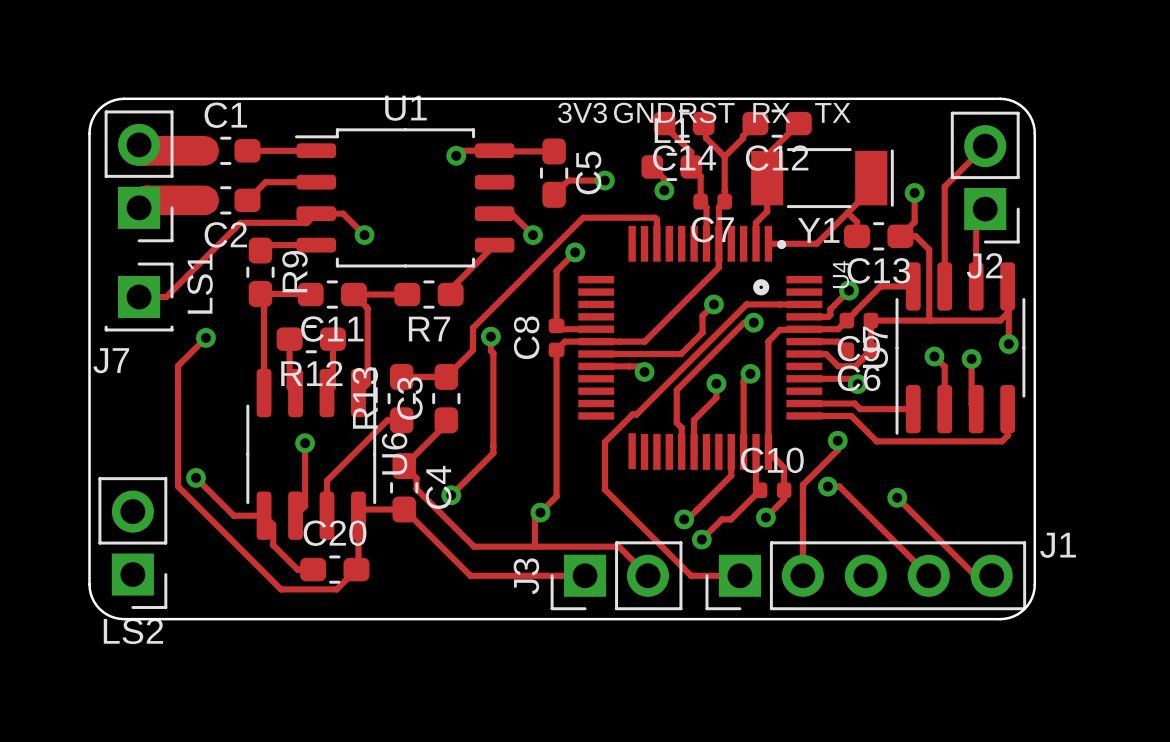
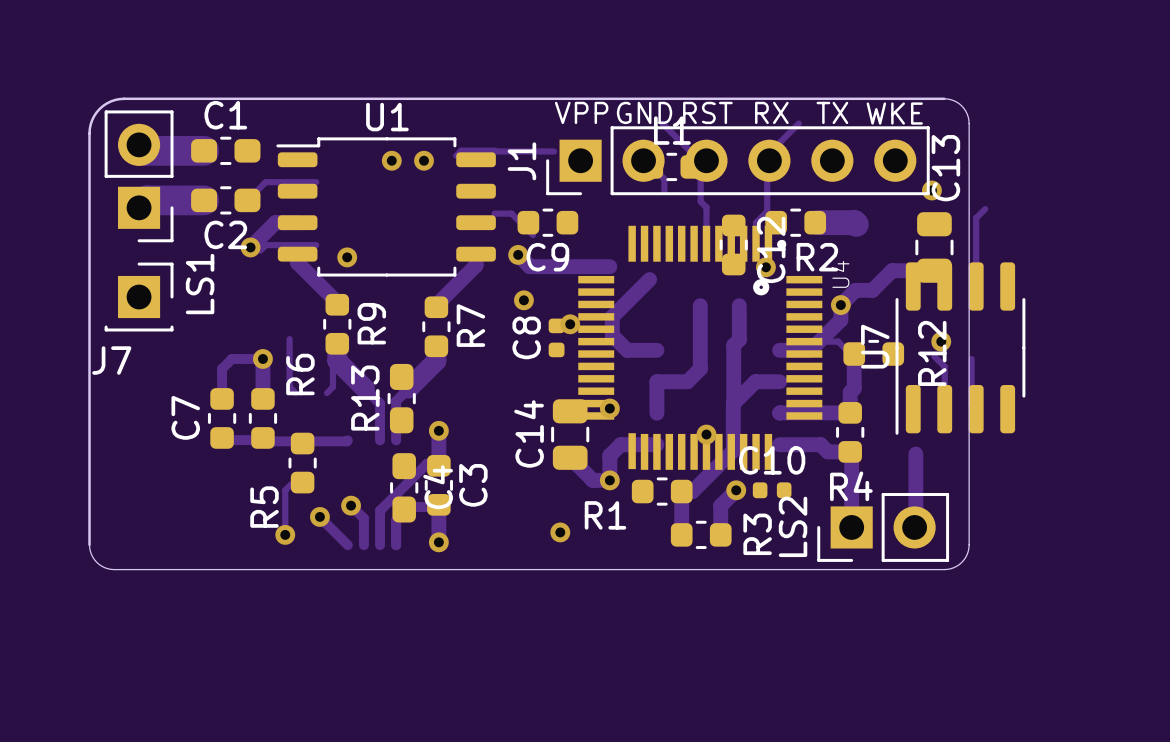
board edge: (944, 98) (1009, 99) (1017, 103) (1027, 112) (1034, 128) (1034, 584) (1030, 601) (1017, 614) (1000, 619) (119, 618) (103, 611) (92, 597) (89, 584) (89, 544) -> (944, 98) (953, 100) (961, 106) (967, 114) (969, 123) (969, 544) (965, 557) (956, 566) (944, 569) (114, 569) (104, 567) (96, 562) (91, 554) (89, 544)
C14 footprint: [653, 109, 715, 138] -> [551, 399, 590, 470]
C12 footprint: [742, 109, 812, 138] -> [719, 214, 748, 276]
text: 3V3 (582, 112) -> VPP (581, 112)
text: none -> WKE (894, 113)
track: (705, 123) (705, 137) (724, 156) -> none
track: (755, 123) (724, 156) -> none
track: (985, 146) (944, 186) (944, 286) -> none
track: (247, 150) (316, 150) -> none
via: (456, 155) -> none
track: (724, 156) (724, 201) (718, 207) (718, 267) (644, 341) (564, 341) (556, 349) (556, 496) (534, 518) (534, 546) -> none
C14 name position: C14 (684, 158) -> C14 (529, 433)
via: none -> (391, 160)
via: none -> (424, 160)
C5: (554, 173) -> none
J2: (985, 177) -> none
Y1: (822, 178) -> none
track: (871, 178) (871, 189) (816, 243) (768, 243) -> none
track: (604, 180) (568, 180) (554, 194) -> none
via: (604, 180) -> none
via: (664, 190) -> none
track: (914, 192) (914, 222) (900, 236) (915, 236) (929, 249) (930, 320) -> none
via position: (914, 192) -> (931, 190)
C7 footprint: [693, 193, 733, 210] -> [207, 388, 237, 449]
U1 position: (404, 197) -> (386, 206)
track: (847, 212) (857, 222) (857, 236) -> none
track: none -> (297, 222) (275, 222) (250, 247)
R2: none -> (795, 222)
track: none -> (817, 222) (854, 222) (856, 224)
C13 footprint: [844, 222, 914, 251] -> [915, 212, 954, 283]
track: (364, 235) (343, 213) (316, 213) (307, 222) (240, 222) (166, 297) (139, 297) -> none
via position: (364, 235) -> (347, 257)
via position: (533, 235) -> (518, 254)
R9 footprint: [246, 237, 275, 307] -> [323, 293, 352, 355]
track: (656, 243) (656, 219) (655, 217) (583, 217) (472, 328) (472, 350) (446, 376) (401, 376) -> none
track: (494, 245) (450, 289) (450, 294) -> none
via: none -> (250, 247)
track: (575, 252) (556, 271) (556, 325) (559, 329) (596, 329) -> none
via: (575, 252) -> none
track: none -> (297, 254) (297, 262) (337, 302)
track: none -> (476, 254) (476, 265) (436, 305)
track: none -> (518, 254) (529, 266) (609, 266)
via: none -> (765, 267)
C13 name position: C13 (878, 270) -> C13 (945, 168)
track: none -> (934, 270) (892, 270) (872, 290) (855, 290) (840, 305) (840, 319) (810, 350) (779, 350)
track: none -> (649, 279) (612, 316) (612, 335) (627, 350) (656, 350)
R7 footprint: [394, 280, 464, 309] -> [422, 296, 451, 358]
track: (913, 286) (880, 286) (855, 311) -> none
track: (849, 290) (830, 309) (828, 316) (804, 316) -> none
via position: (849, 290) -> (840, 305)
track: (310, 294) (260, 293) (264, 297) (264, 393) -> none
C11: (332, 294) -> none
track: (407, 294) (354, 294) (367, 308) (367, 383) (358, 393) -> none
via: none -> (523, 300)
track: (713, 304) (702, 315) (702, 332) (681, 354) (596, 354) -> none
via: (713, 304) -> none
track: (804, 304) (746, 304) (636, 414) (632, 414) (604, 442) (604, 489) (691, 575) (739, 575) -> none
track: none -> (700, 305) (700, 368) (687, 381) (656, 381) (656, 413)
track: none -> (739, 305) (739, 339) (733, 345) (733, 403)
C9 footprint: [839, 312, 879, 329] -> [517, 208, 579, 237]
track: (855, 312) (838, 329) (779, 329) (768, 341) (768, 451) (784, 467) (784, 499) (765, 517) -> none
track: (753, 322) (744, 322) (676, 390) (676, 422) (681, 427) (681, 451) -> none
via: (753, 322) -> none
via: none -> (570, 324)
R12 footprint: [276, 325, 346, 354] -> [843, 339, 905, 369]
R7 name position: R7 (429, 329) -> R7 (470, 325)
track: (490, 336) (490, 350) (493, 353) (493, 453) (451, 495) -> none
via: (490, 336) -> none
track: (205, 337) (178, 365) (178, 486) (280, 589) (336, 589) (358, 567) (358, 515) (364, 509) (404, 509) (470, 575) (585, 575) -> none
via: (205, 337) -> none
track: (1008, 344) (1007, 286) (1007, 313) (1000, 320) (870, 320) (870, 350) (862, 358) -> none
via: (1008, 344) -> none
track: none -> (337, 345) (337, 360) (380, 403) (380, 440)
track: none -> (436, 348) (436, 360) (396, 401) (396, 440)
C6: (858, 350) -> none
track: (804, 354) (826, 354) (838, 366) (855, 366) (862, 359) -> none
track: none -> (854, 354) (854, 388) (850, 392) (850, 412) (779, 413)
via position: (934, 356) -> (941, 341)
via: none -> (262, 358)
via: (971, 358) -> none
C3 footprint: [432, 363, 461, 434] -> [424, 454, 454, 516]
track: (596, 366) (638, 366) (644, 371) -> none
via: (644, 371) -> none
R12 name position: R12 (311, 373) -> R12 (932, 353)
track: (750, 373) (743, 380) (743, 451) -> none
via: (750, 373) -> none
track: (804, 378) (852, 378) (857, 384) -> none
track: none -> (779, 381) (755, 381) (733, 403) (733, 450) (692, 491) (681, 491) (681, 534)
track: (716, 383) (716, 397) (694, 420) (694, 451) -> none
via: (716, 383) -> none
via: (857, 384) -> none
track: none -> (222, 396) (222, 368) (231, 358) (262, 358) (262, 396)
C3 name position: C3 (409, 398) -> C3 (473, 485)
track: (804, 402) (854, 403) (860, 409) (913, 409) -> none
via: none -> (609, 408)
track: (1007, 409) (1007, 435) (1002, 441) (876, 441) (851, 415) (804, 415) -> none
R6: none -> (262, 418)
track: (401, 420) (387, 420) (327, 480) (327, 515) -> none
track: (446, 420) (446, 424) (404, 466) -> none
track: none -> (438, 430) (438, 463) (427, 463) (380, 510) (380, 545)
via: none -> (438, 430)
R4: none -> (850, 432)
via: none -> (706, 434)
track: none -> (222, 440) (347, 440)
track: (837, 440) (837, 450) (802, 485) (802, 575) -> none
via: (837, 440) -> none
track: (305, 443) (305, 506) (295, 515) -> none
via: (305, 443) -> none
track: none -> (656, 444) (620, 444) (609, 455) (609, 480) (592, 480) (570, 457)
track: none -> (779, 444) (820, 444) (827, 451) (851, 453) (851, 527)
track: (731, 451) (731, 475) (687, 519) (684, 519) -> none
track: (756, 451) (756, 486) (760, 490) (731, 519) (721, 519) (701, 539) -> none
U6: (311, 453) -> none
track: none -> (915, 454) (914, 527)
R5: none -> (302, 463)
track: (404, 466) (416, 478) (416, 489) (474, 546) (618, 546) (648, 575) -> none
track: (196, 477) (233, 515) (264, 515) (273, 524) (273, 545) (297, 569) (313, 569) -> none
via: (196, 477) -> none
via: none -> (609, 480)
track: none -> (302, 484) (290, 484) (285, 490) (285, 534)
track: (827, 486) (839, 486) (928, 575) (928, 571) -> none
via: (827, 486) -> none
track: none -> (736, 490) (720, 505) (720, 534)
via: none -> (736, 490)
R1: none -> (662, 491)
via: (451, 495) -> none
track: (897, 497) (975, 575) (991, 575) -> none
via: (897, 497) -> none
track: none -> (351, 505) (363, 518) (363, 545)
via: none -> (351, 505)
via position: (540, 512) -> (560, 532)
via: none -> (319, 516)
track: none -> (319, 517) (347, 545)
via: (765, 517) -> none
via: (684, 519) -> none
via: none -> (285, 534)
R3: none -> (701, 534)
via: (701, 539) -> none
J1 footprint: [705, 541, 1027, 611] -> [546, 126, 930, 196]
track: none -> (438, 542) (438, 507) (409, 507) (396, 520) (396, 545)
via: none -> (438, 542)
LS2 rotation: 0° (132, 543) -> 90° clockwise (883, 527)
LS2 position: (132, 543) -> (883, 527)
J1 name position: J1 (1057, 545) -> J1 (521, 161)
C20: (334, 569) -> none
J3: (616, 575) -> none

